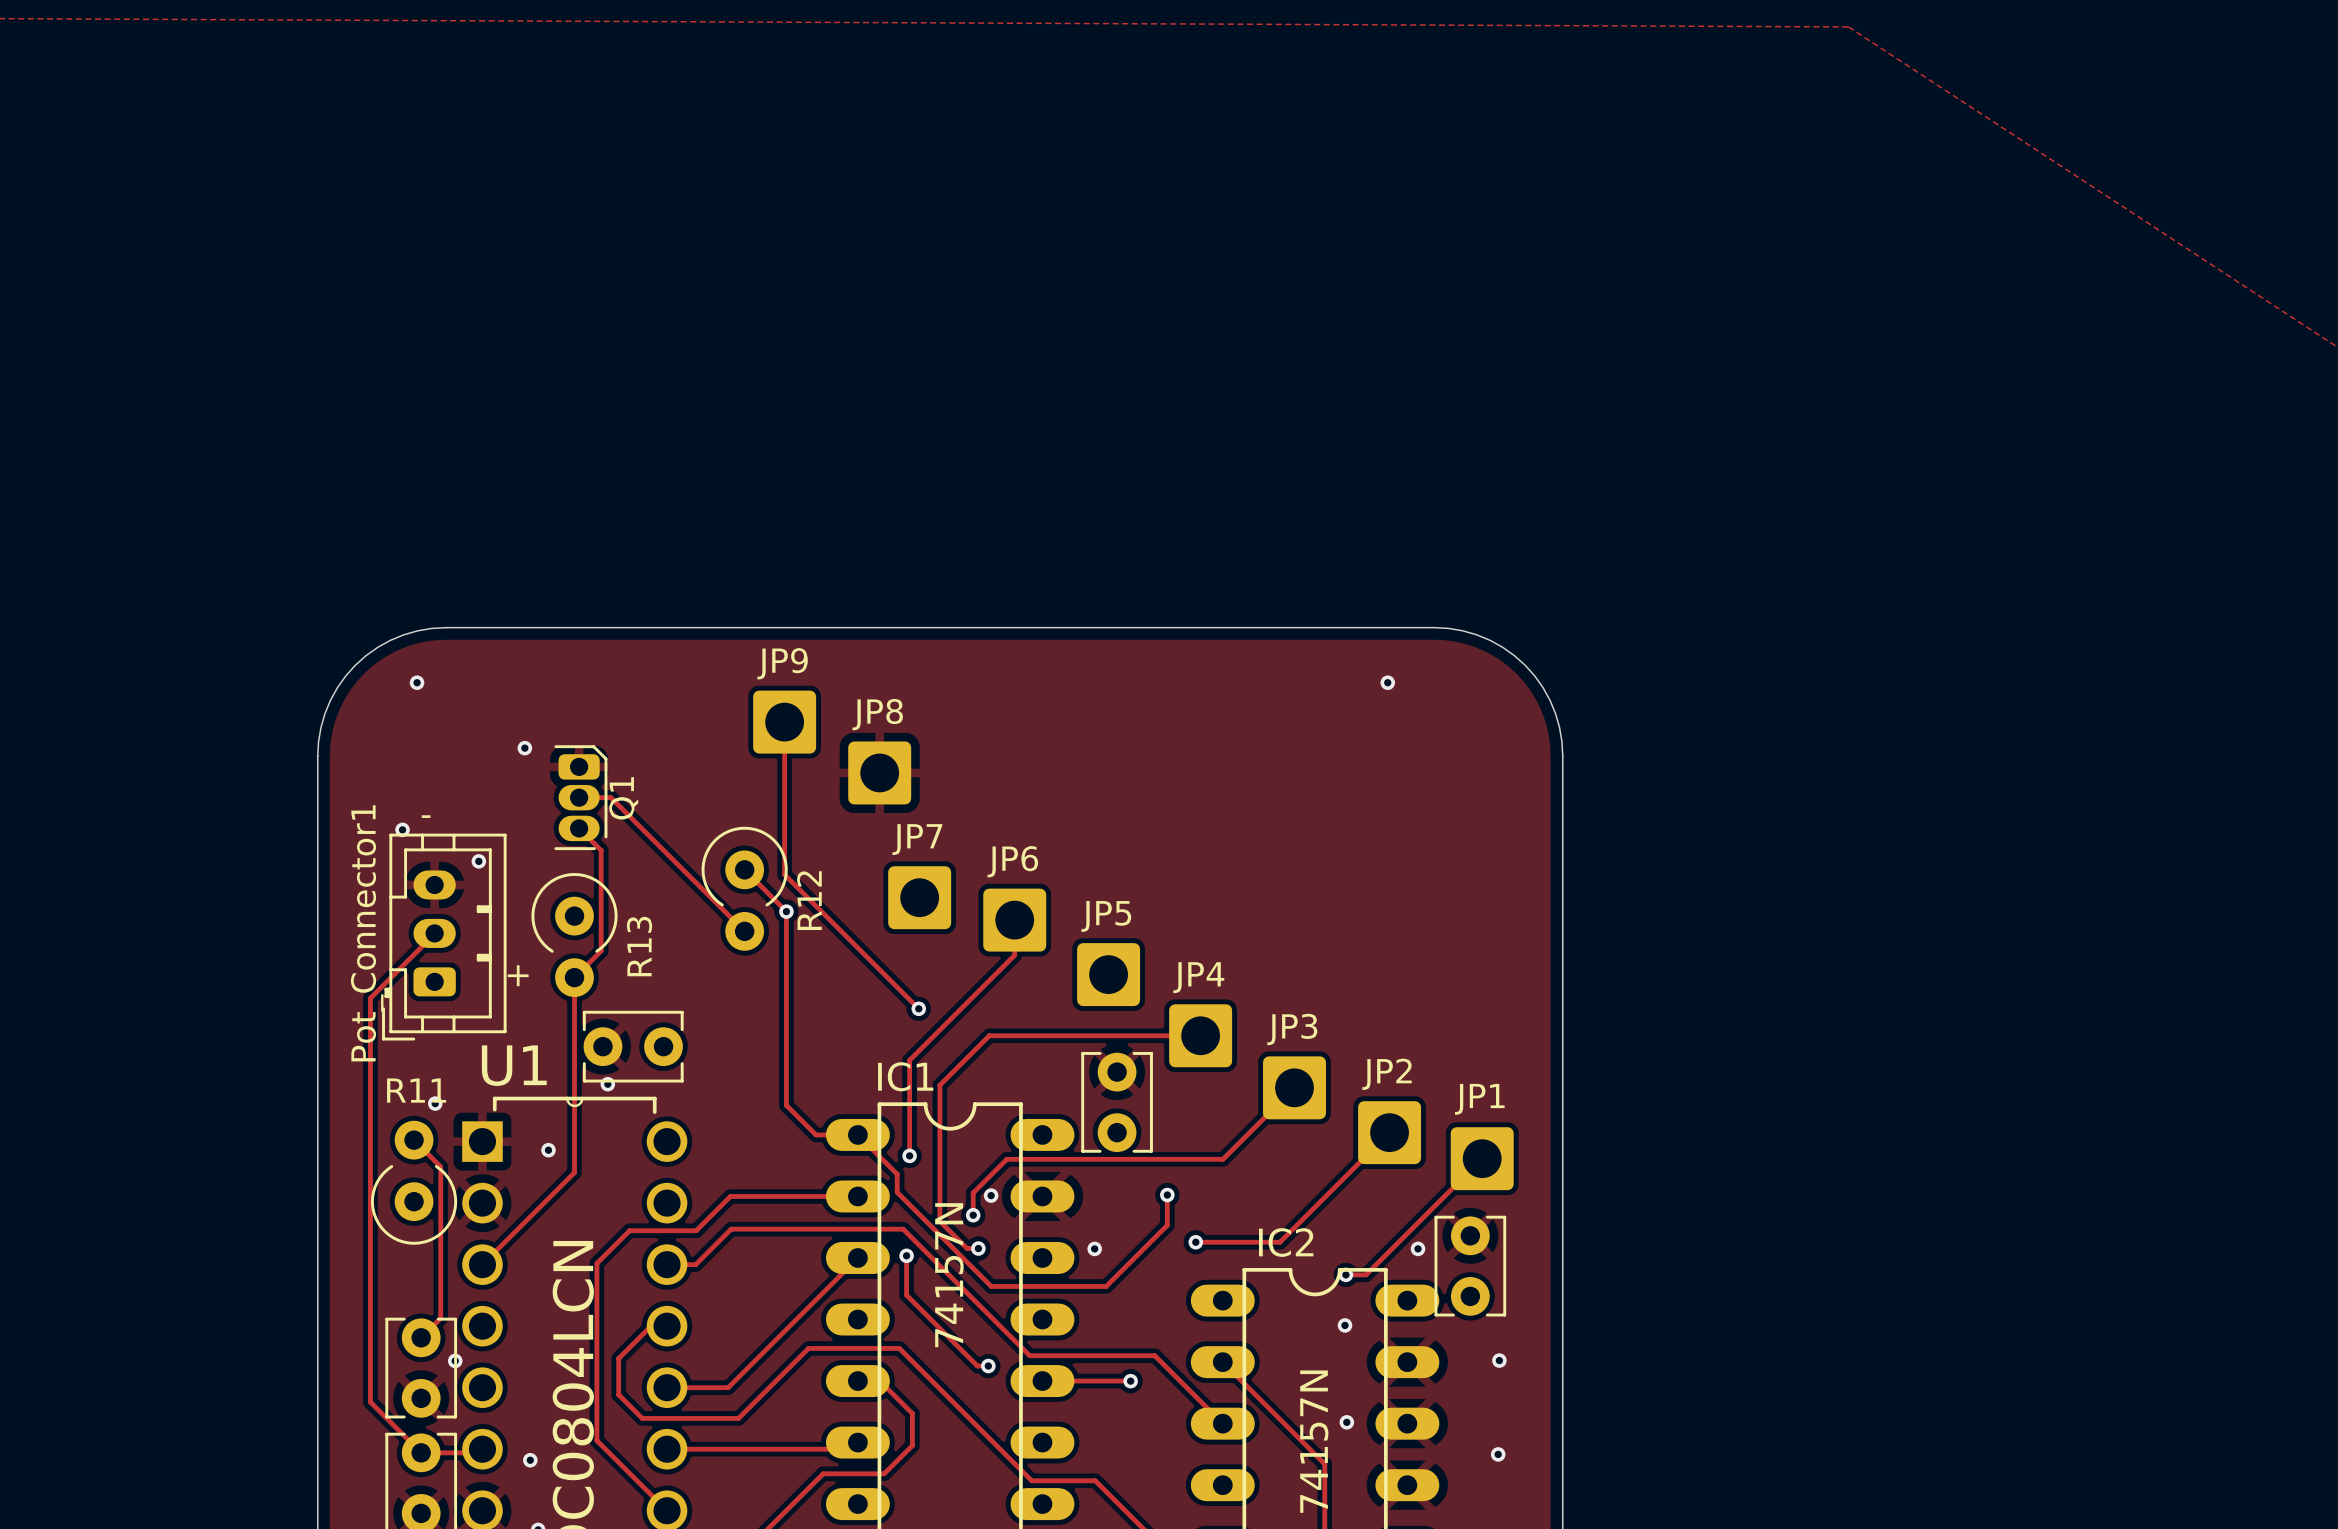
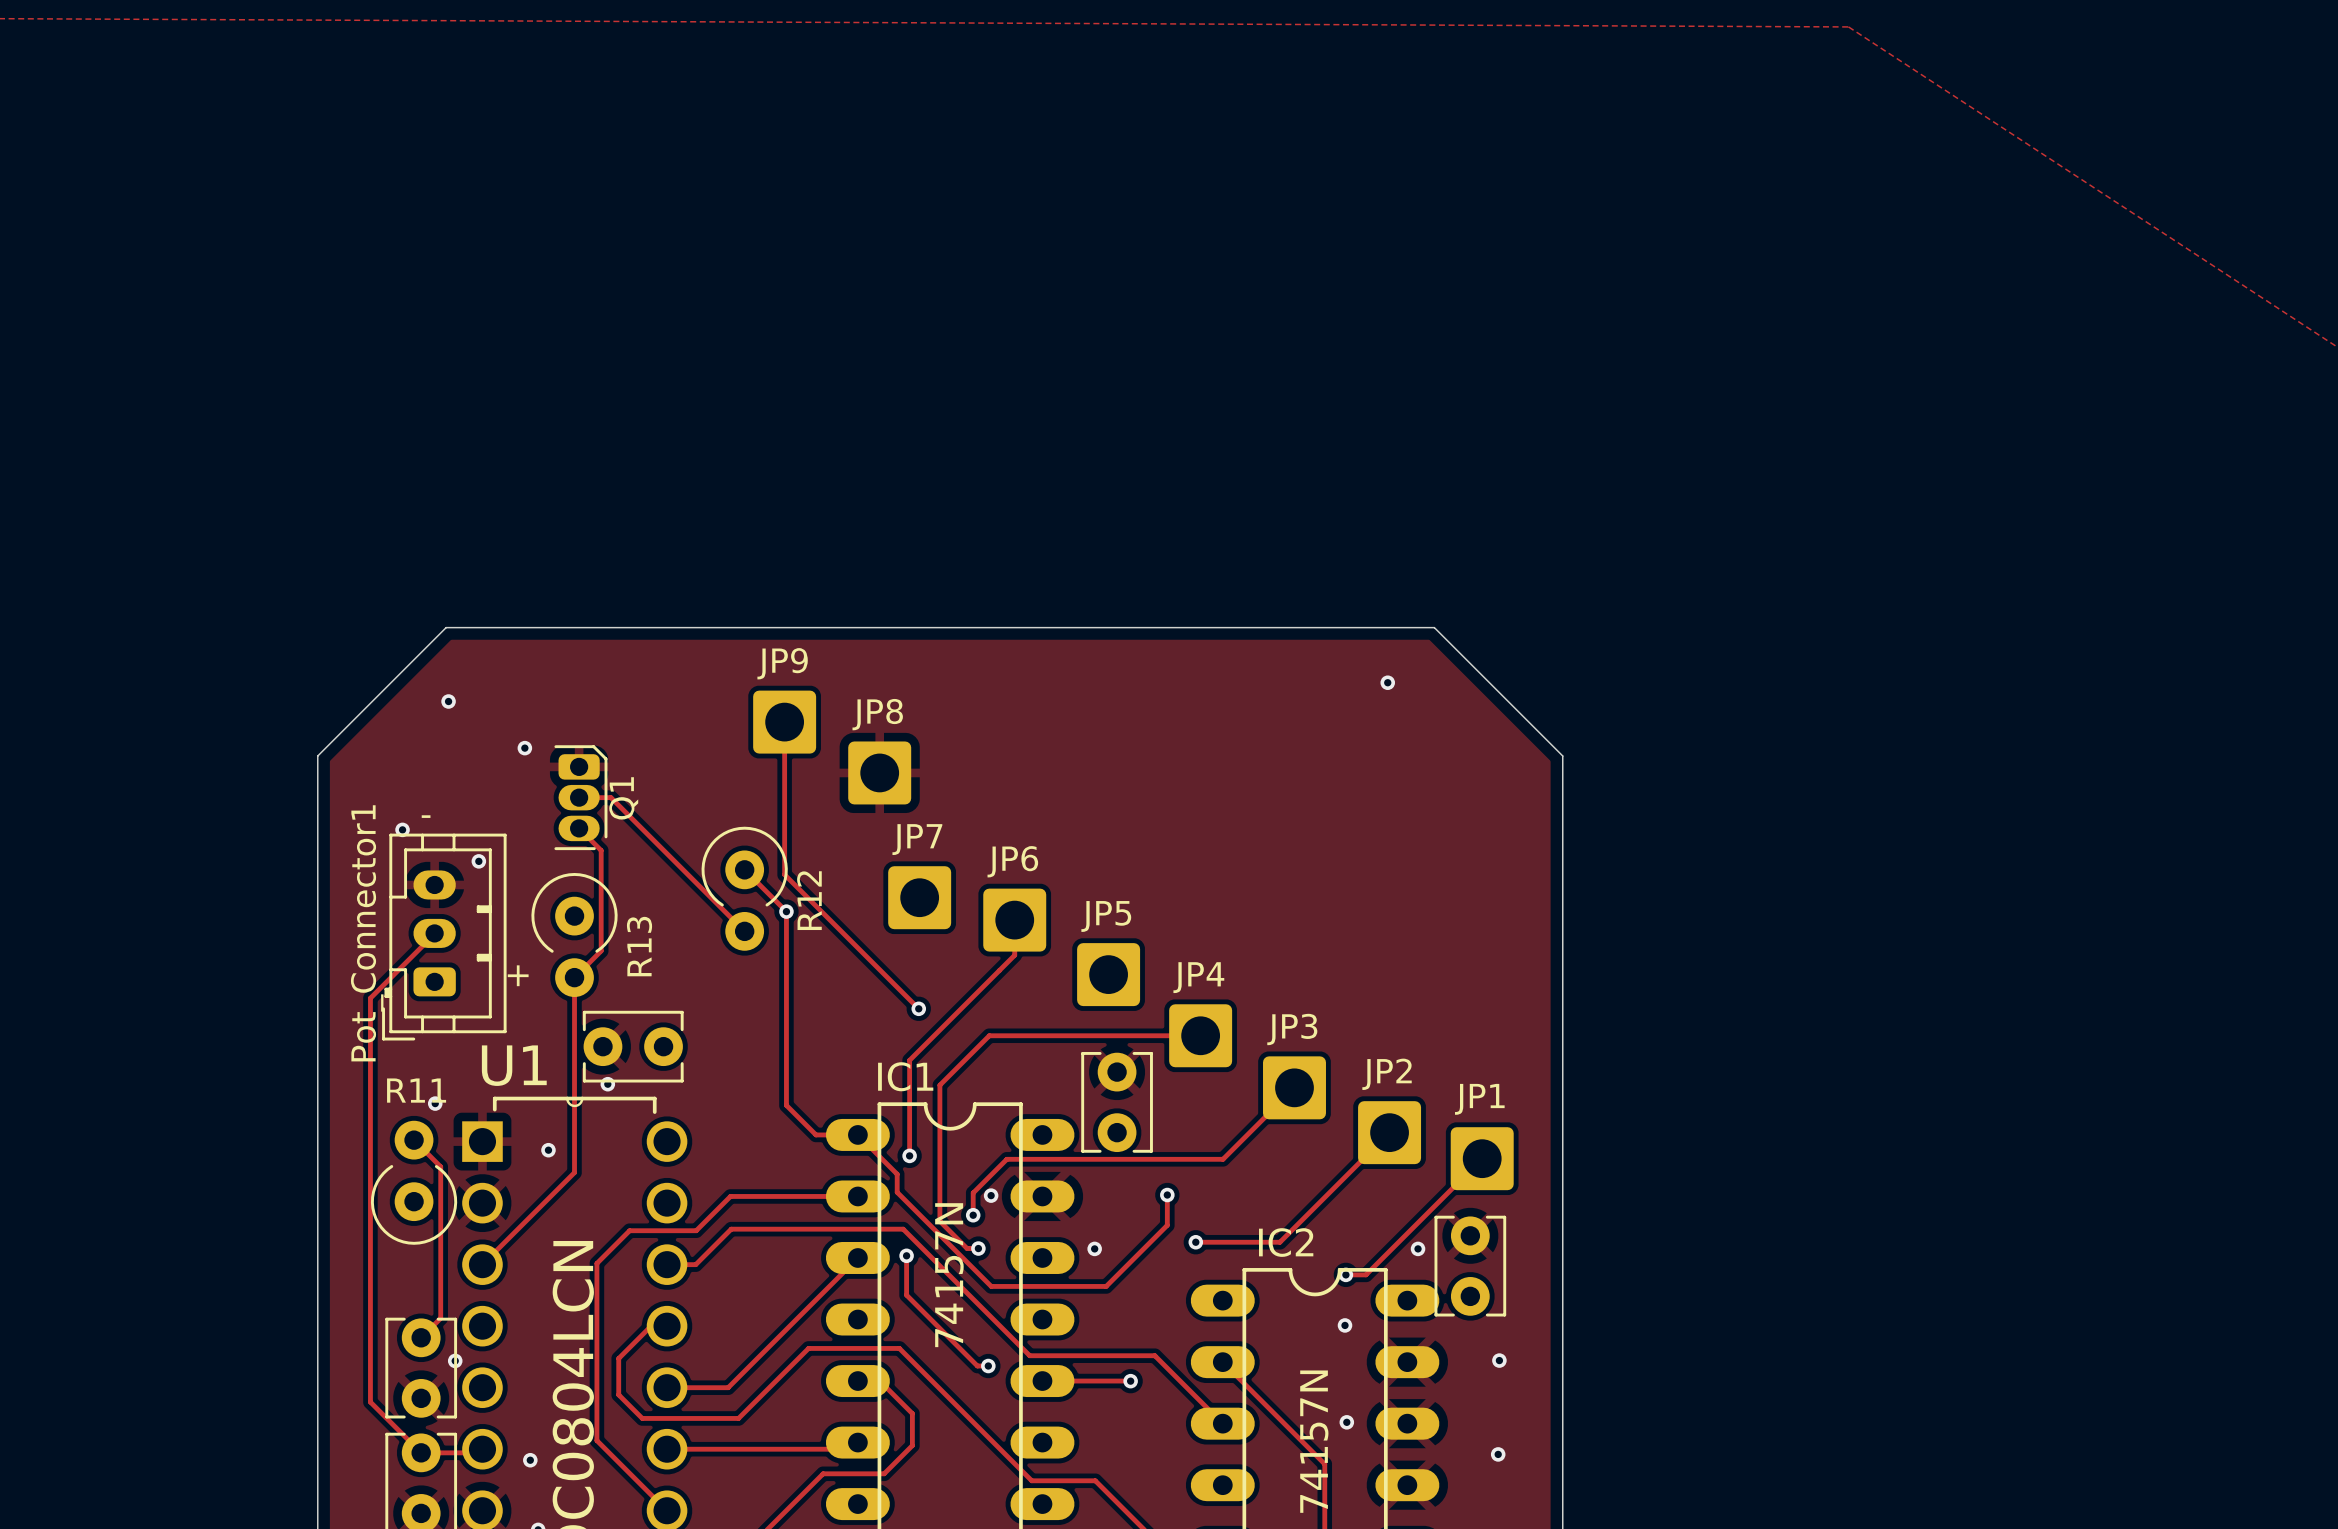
board edge: (446, 627) (431, 628) (403, 634) (377, 647) (355, 665) (337, 687) (324, 713) (320, 727) (317, 756) -> (446, 627) (317, 756)
board edge: (1434, 627) (1462, 630) (1490, 640) (1502, 647) (1525, 665) (1543, 687) (1555, 713) (1561, 741) (1562, 756) -> (1434, 627) (1562, 756)
via position: (417, 682) -> (448, 701)

